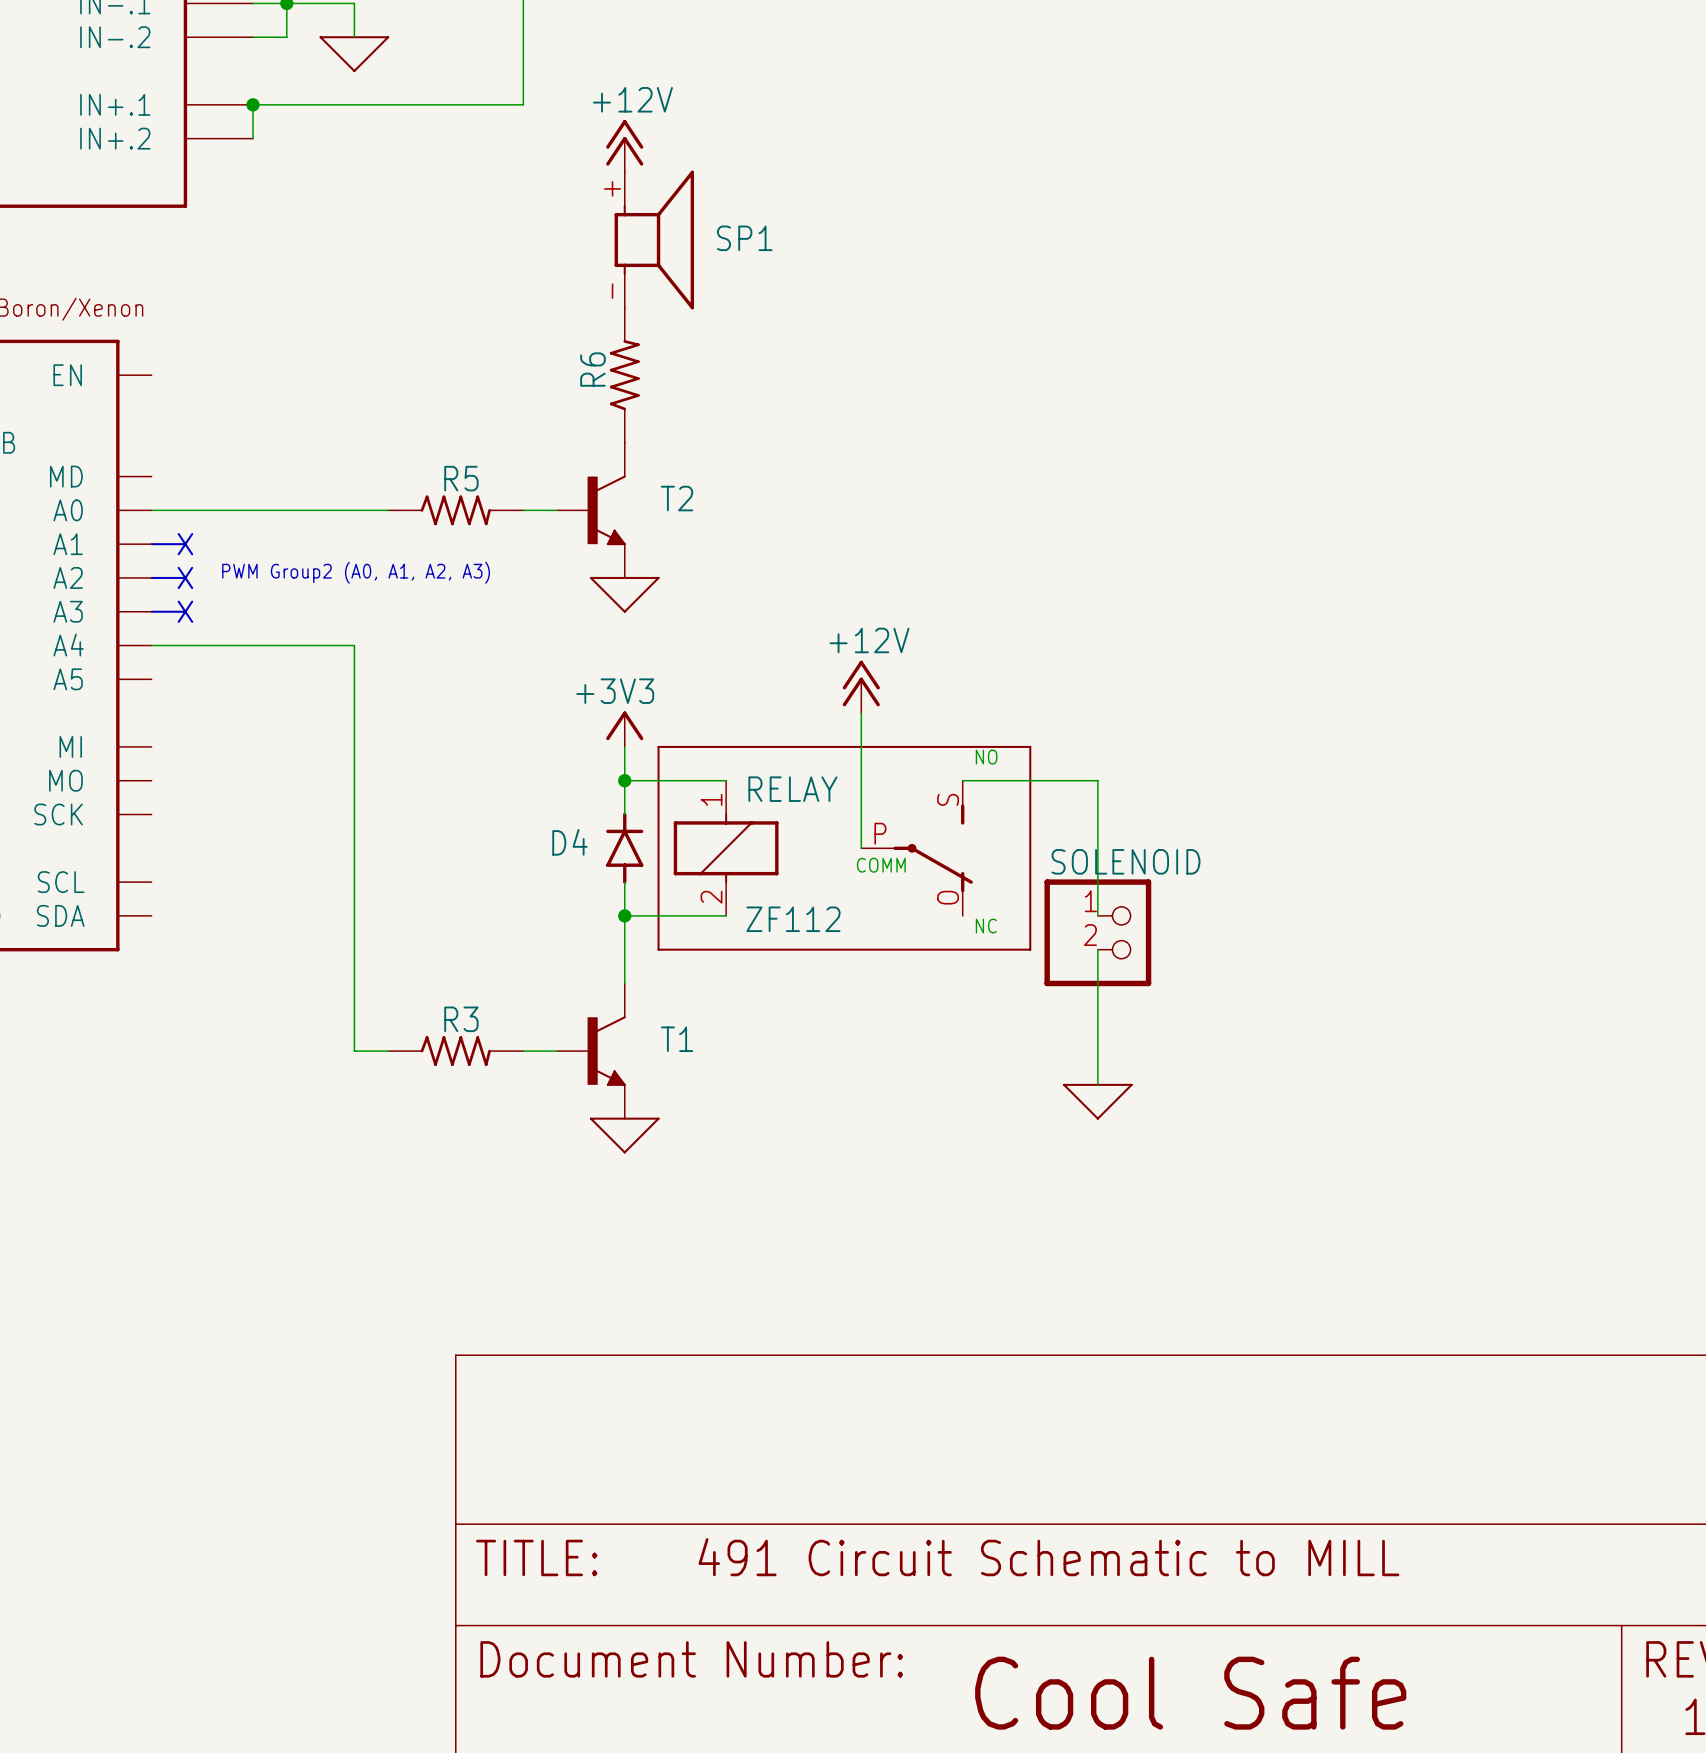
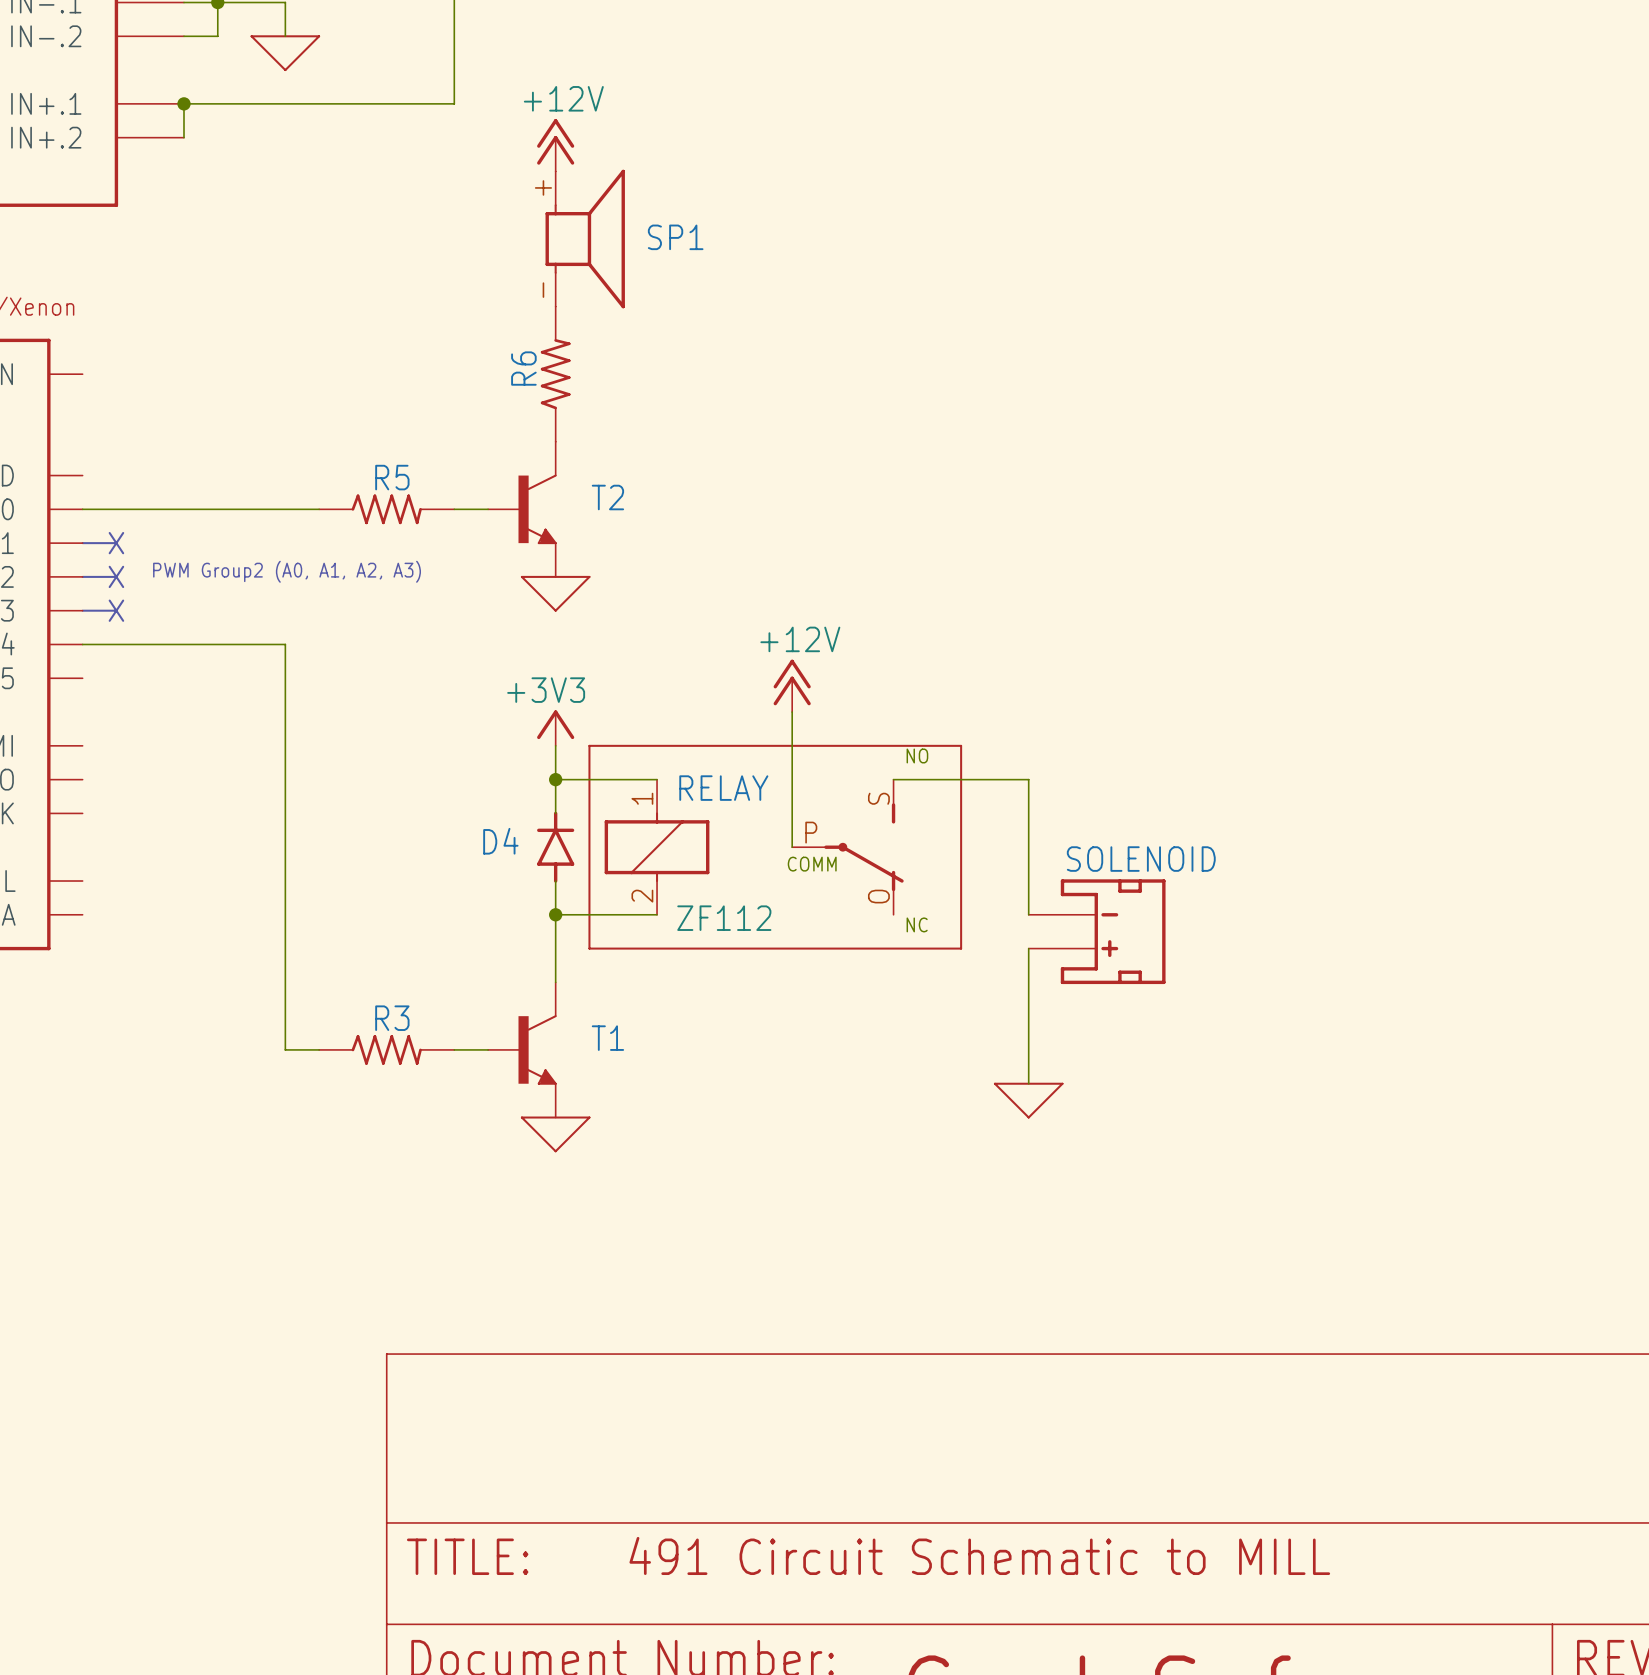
SOLENOID: (1097, 932) -> none
SOLENOID: none -> (1097, 931)

